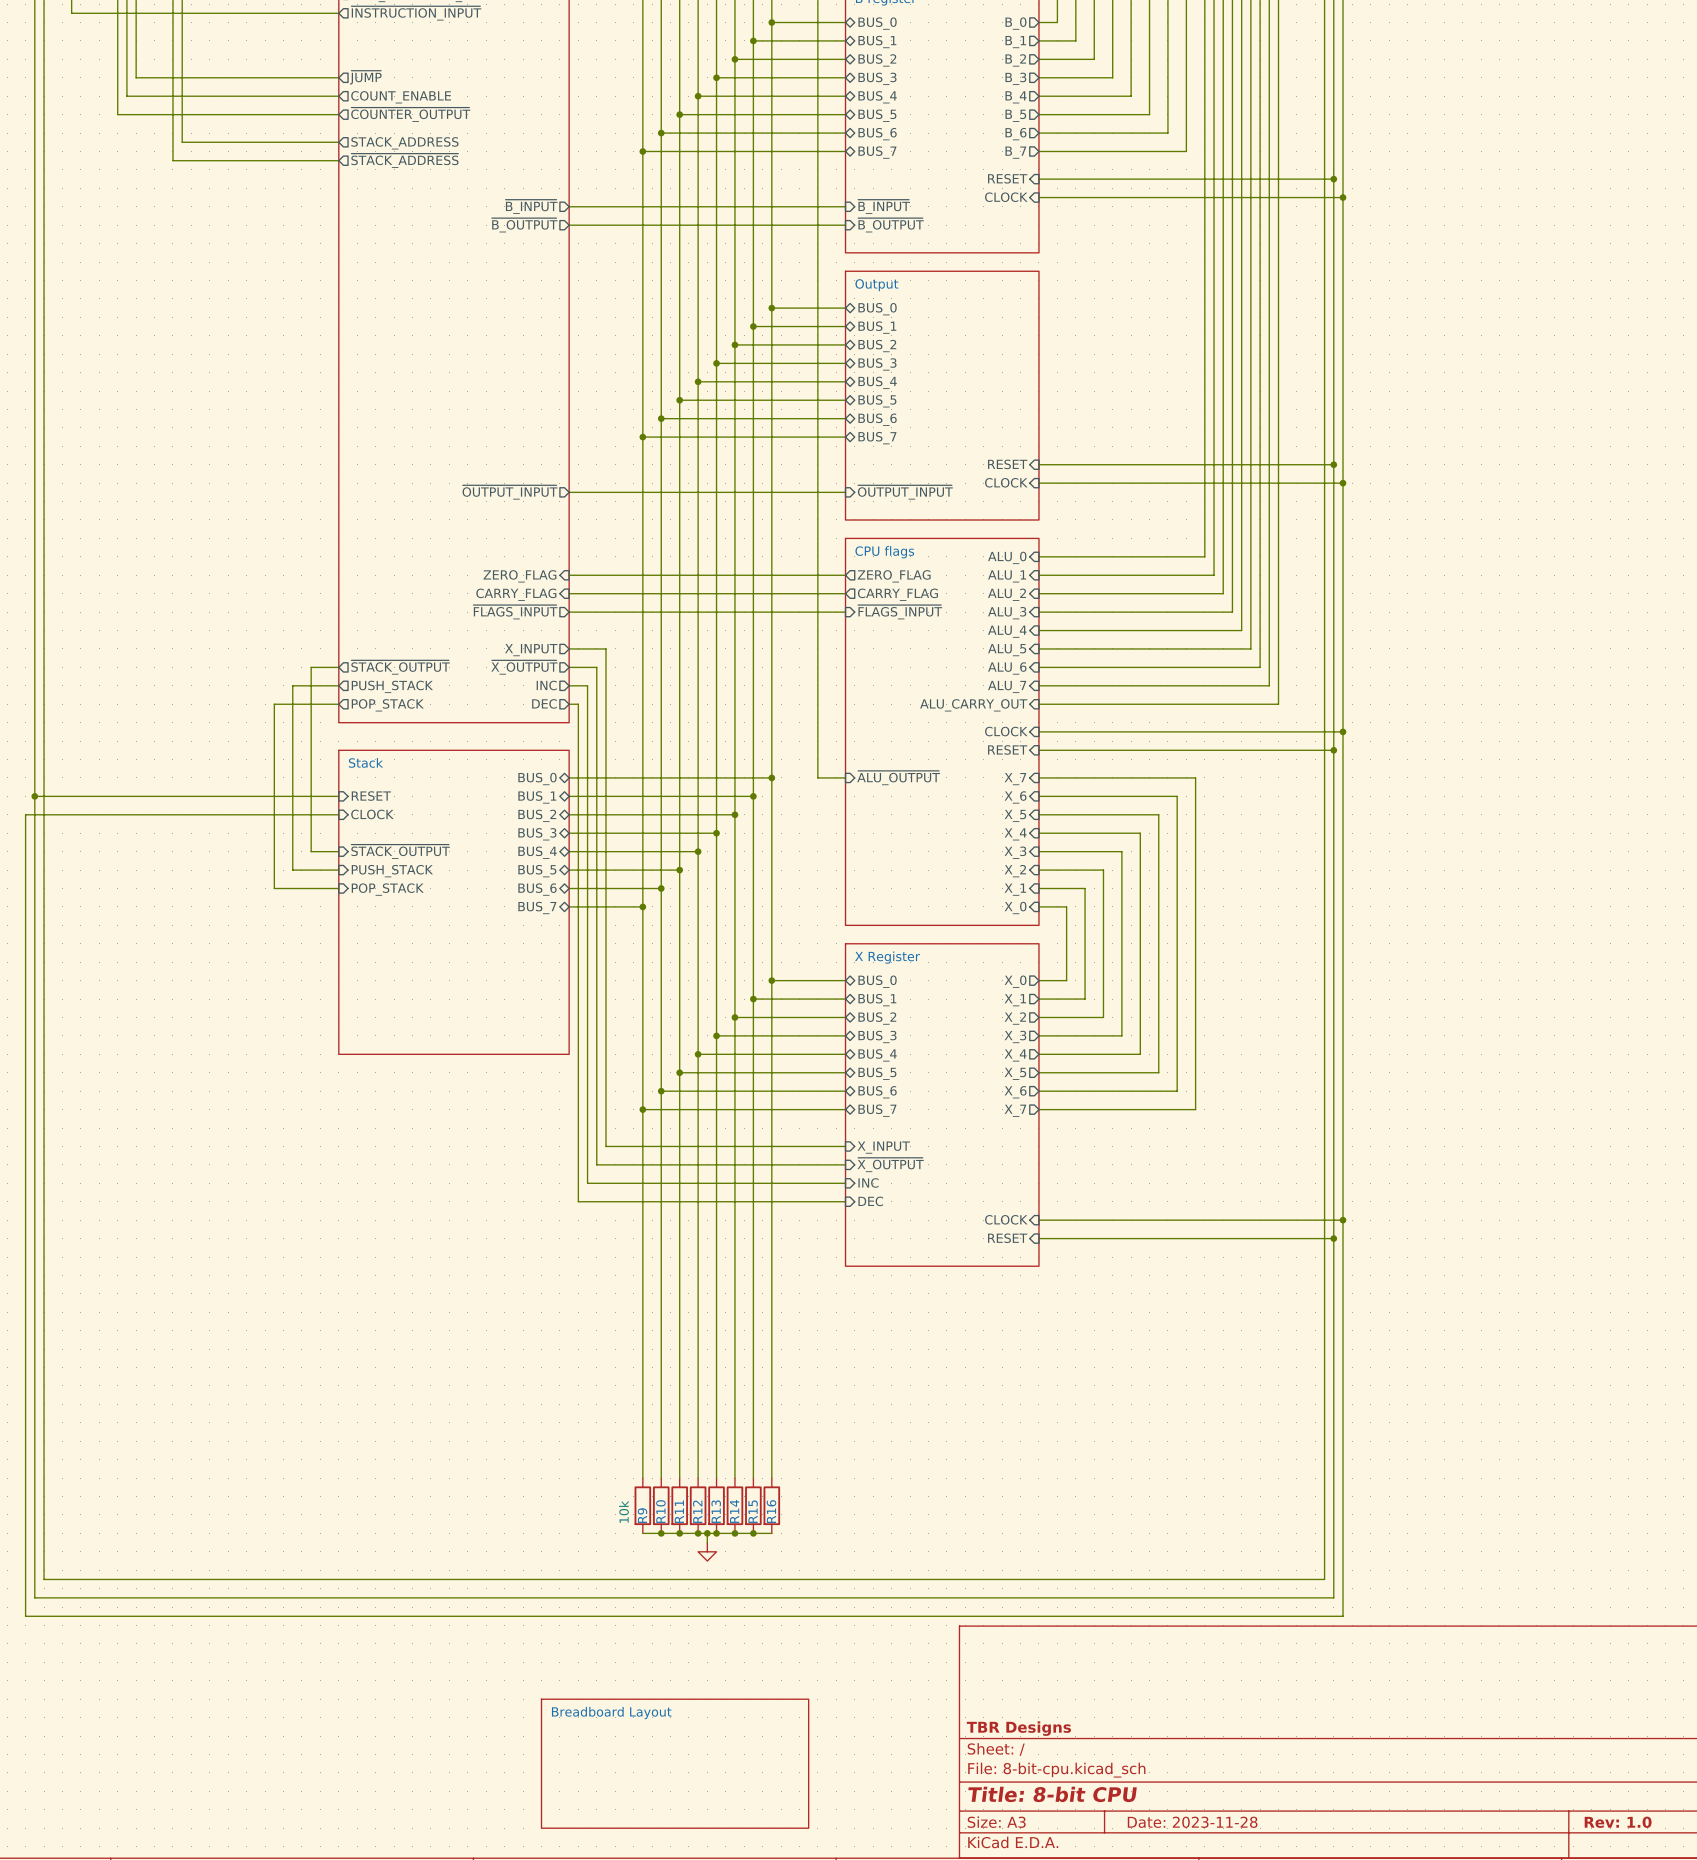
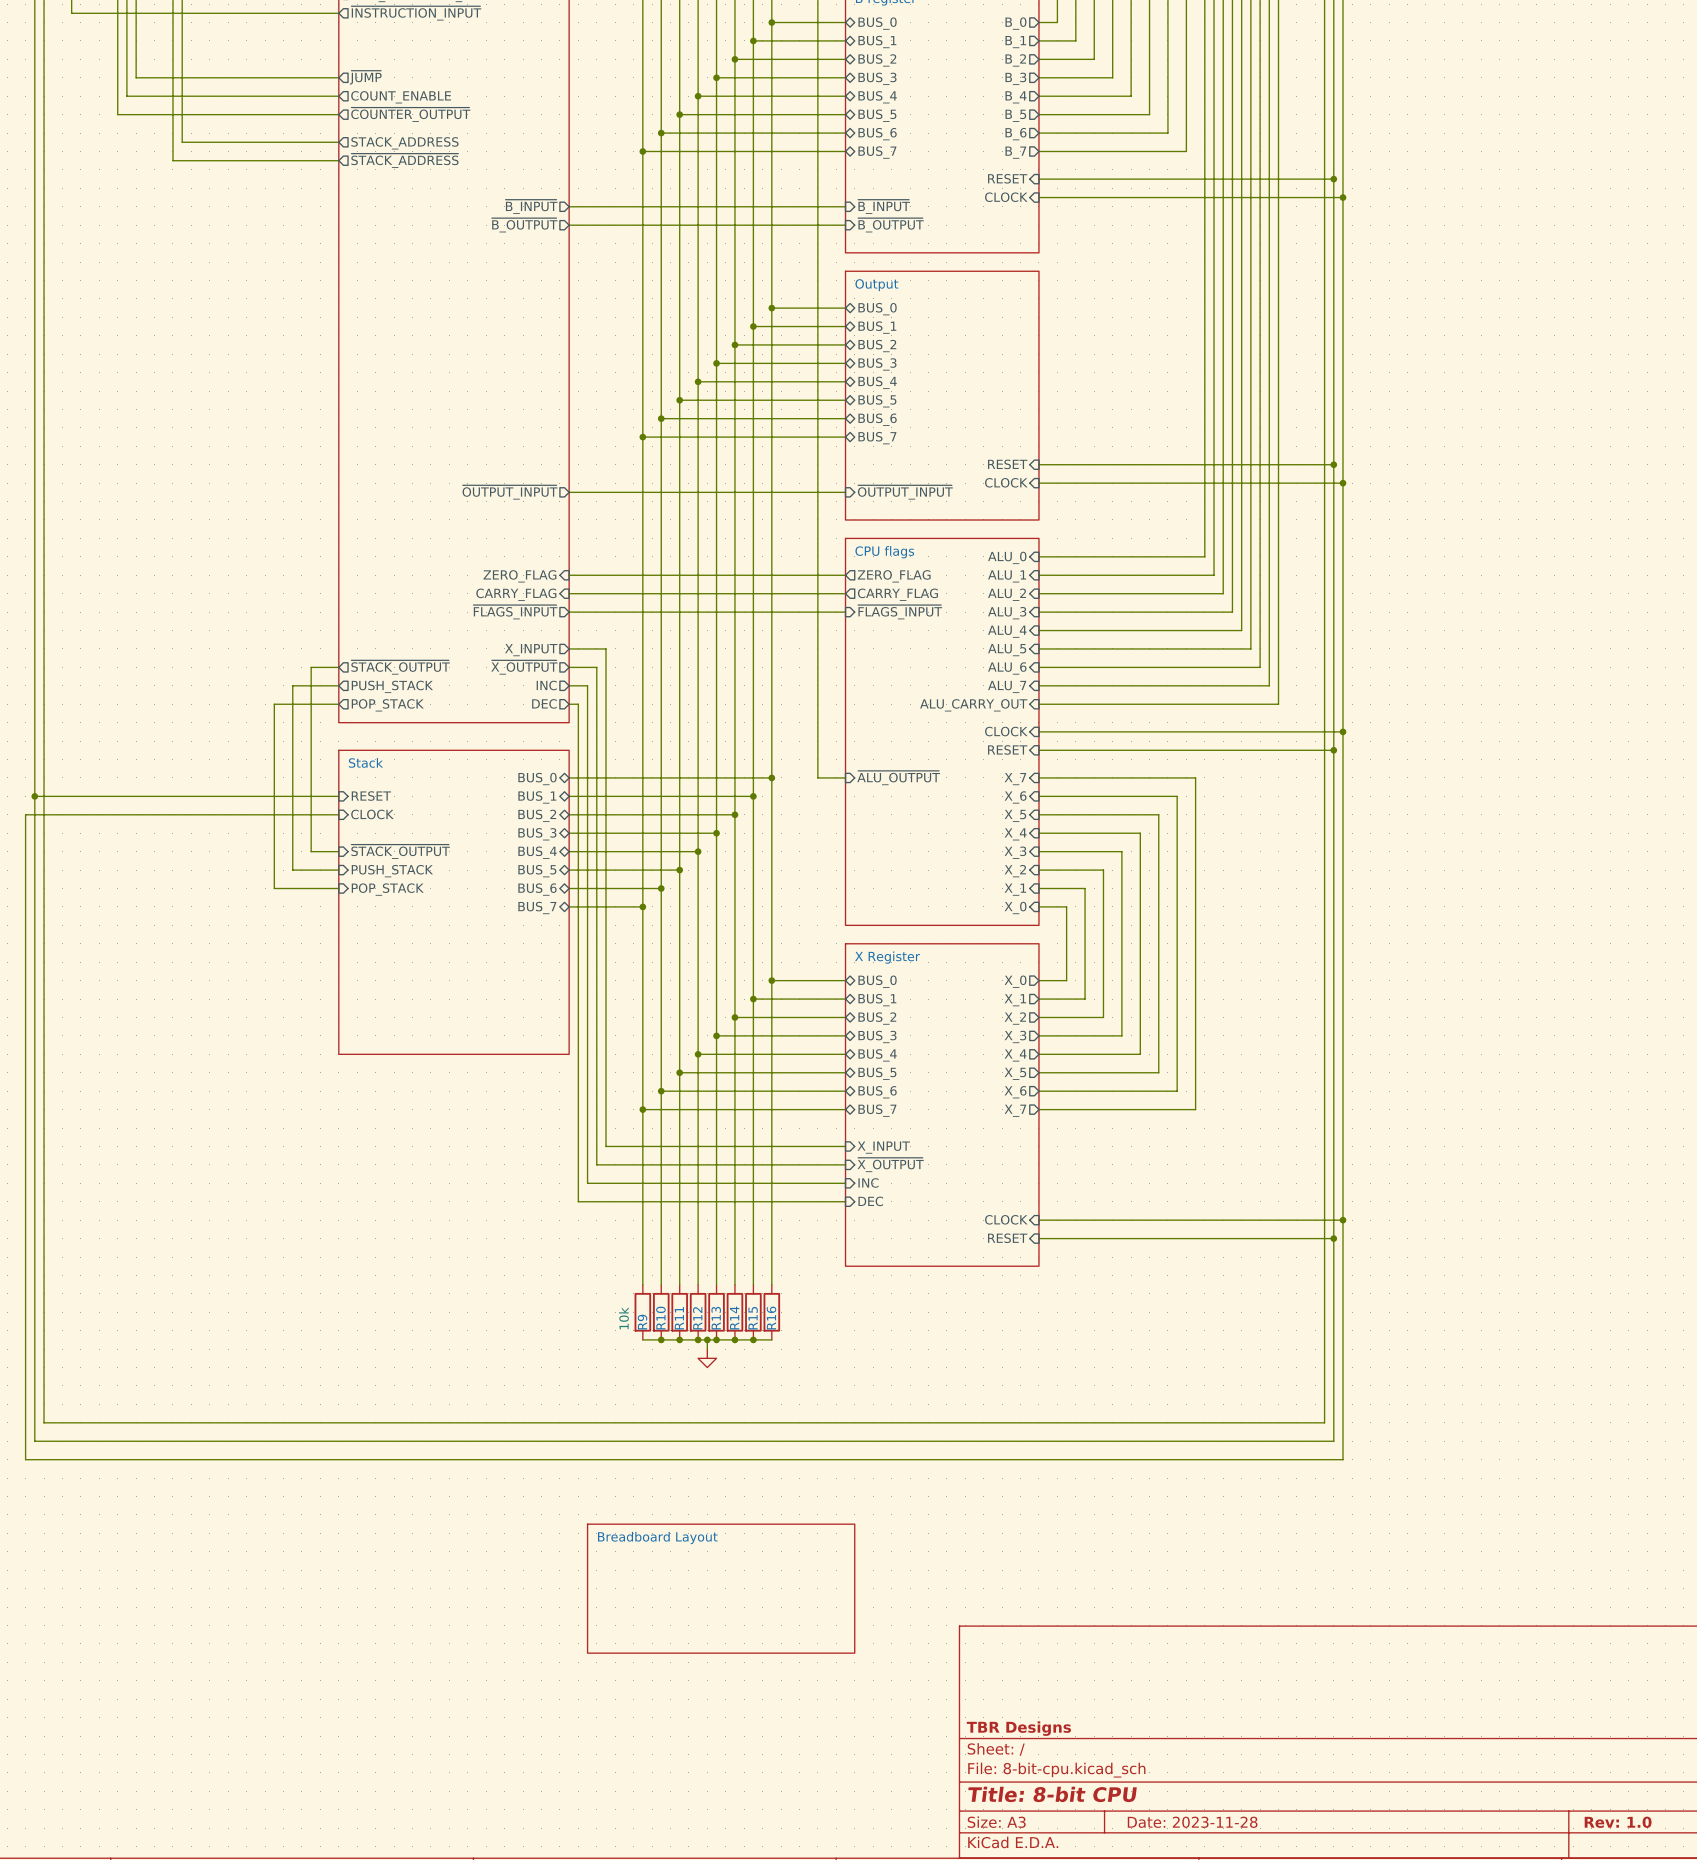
wire: (642, 1284) (642, 1478) -> none
wire: (661, 1284) (661, 1478) -> none
wire: (679, 1284) (679, 1478) -> none
wire: (698, 1284) (698, 1478) -> none
wire: (716, 1284) (716, 1478) -> none
wire: (734, 1284) (734, 1478) -> none
wire: (753, 1284) (753, 1478) -> none
wire: (771, 1284) (771, 1478) -> none
wire: none -> (642, 1339) (771, 1339)
junction: none -> (661, 1339)
junction: none -> (679, 1339)
junction: none -> (698, 1339)
wire: none -> (707, 1339) (707, 1349)
junction: none -> (707, 1339)
junction: none -> (716, 1339)
junction: none -> (734, 1339)
junction: none -> (753, 1339)
power symbol: none -> (707, 1358)
wire: (44, 1422) (44, 1579) (1324, 1579) (1324, 1422) -> (44, 1422) (1324, 1422)
wire: (34, 1441) (34, 1597) (1333, 1597) (1333, 1441) -> (34, 1441) (1333, 1441)
wire: (25, 1459) (25, 1616) (1343, 1616) (1343, 1459) -> (25, 1459) (1343, 1459)
R9 position: (642, 1505) -> (642, 1312)
R10 position: (661, 1505) -> (661, 1312)
R11 position: (679, 1505) -> (679, 1312)
R12 position: (698, 1505) -> (698, 1312)
R13 position: (716, 1505) -> (716, 1312)
R14 position: (734, 1505) -> (734, 1312)
R15 position: (753, 1505) -> (753, 1312)
R16 position: (771, 1505) -> (771, 1312)
wire: (642, 1533) (771, 1533) -> none
junction: (661, 1533) -> none
junction: (679, 1533) -> none
junction: (698, 1533) -> none
wire: (707, 1533) (707, 1542) -> none
junction: (707, 1533) -> none
junction: (716, 1533) -> none
junction: (734, 1533) -> none
junction: (753, 1533) -> none
power symbol: (707, 1551) -> none
sheet Breadboard Layout position: (675, 1763) -> (721, 1588)

